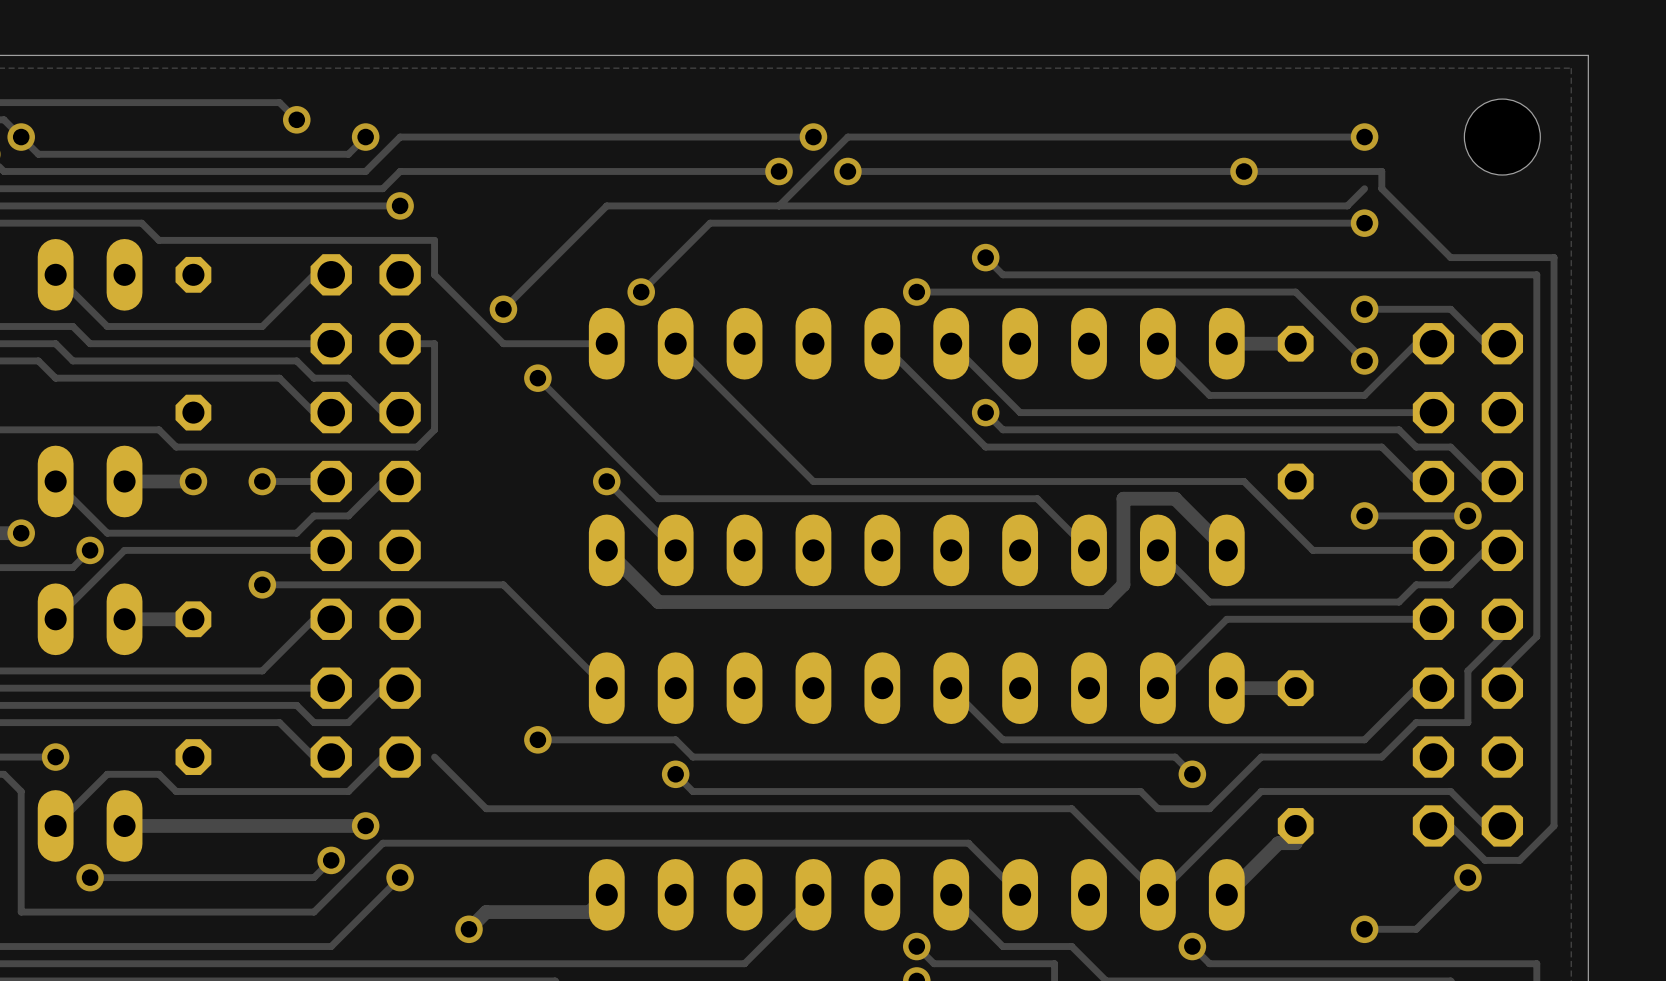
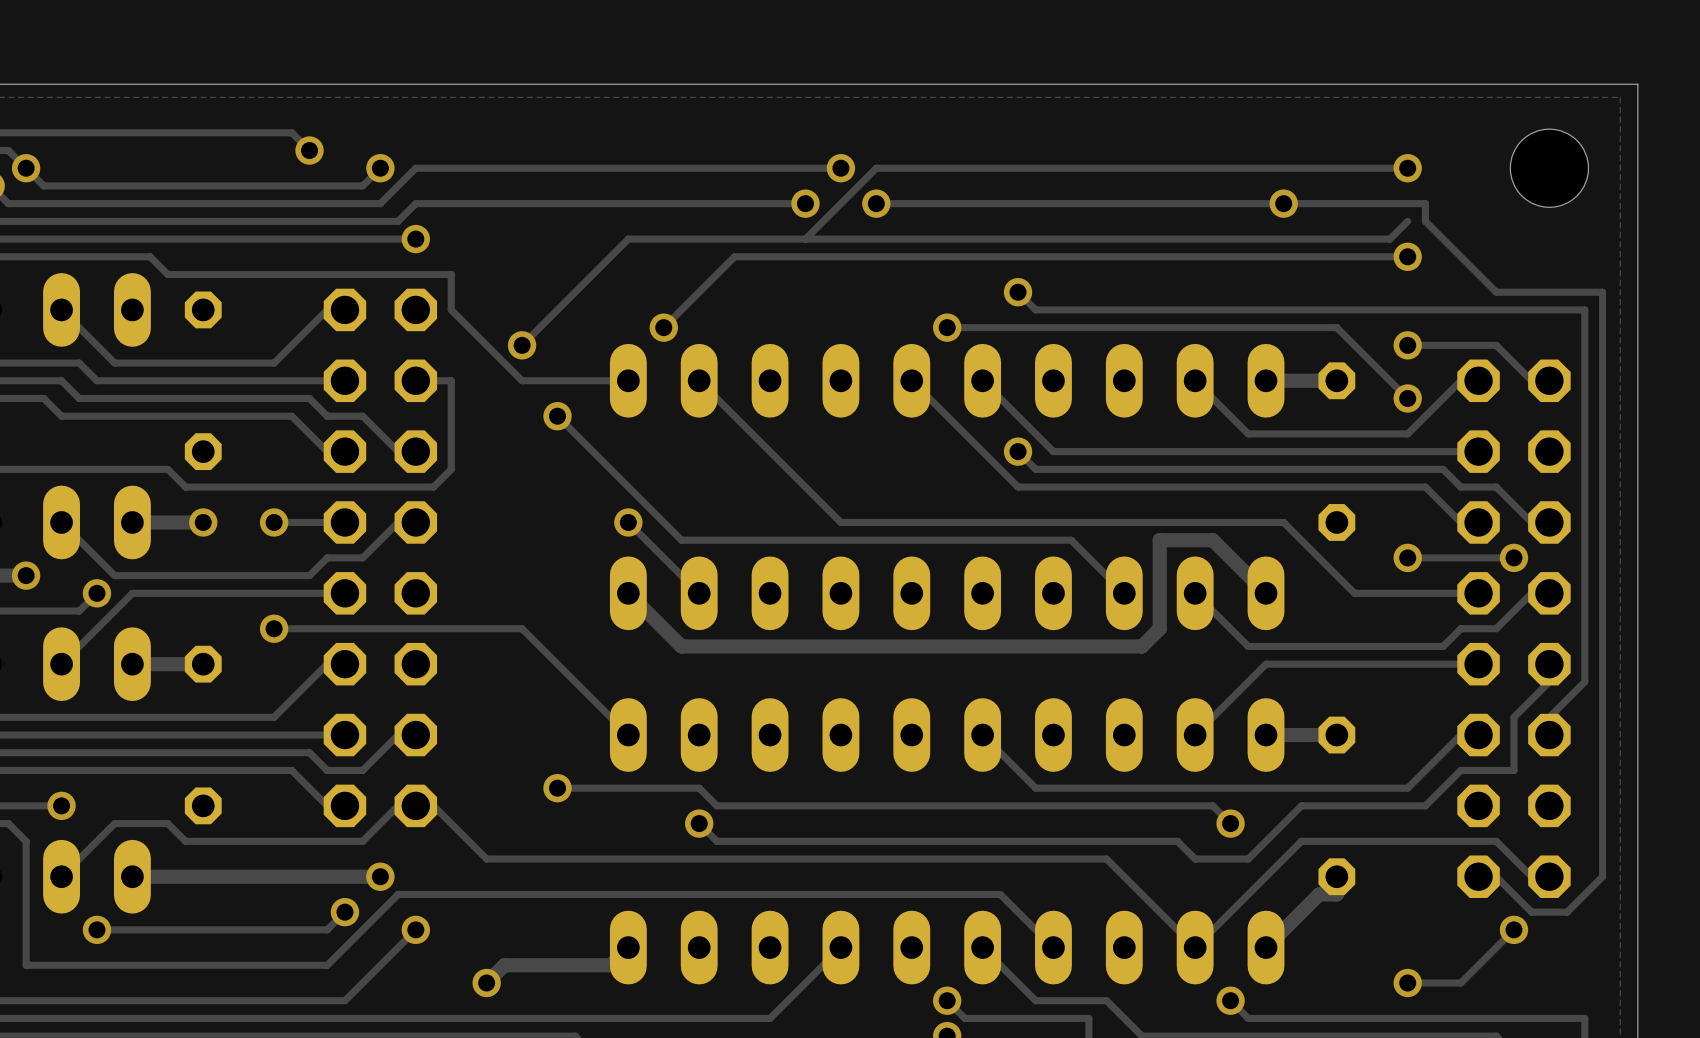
track: (434, 757) (486, 808) -> (415, 805) (433, 805) (486, 859) (504, 859)

